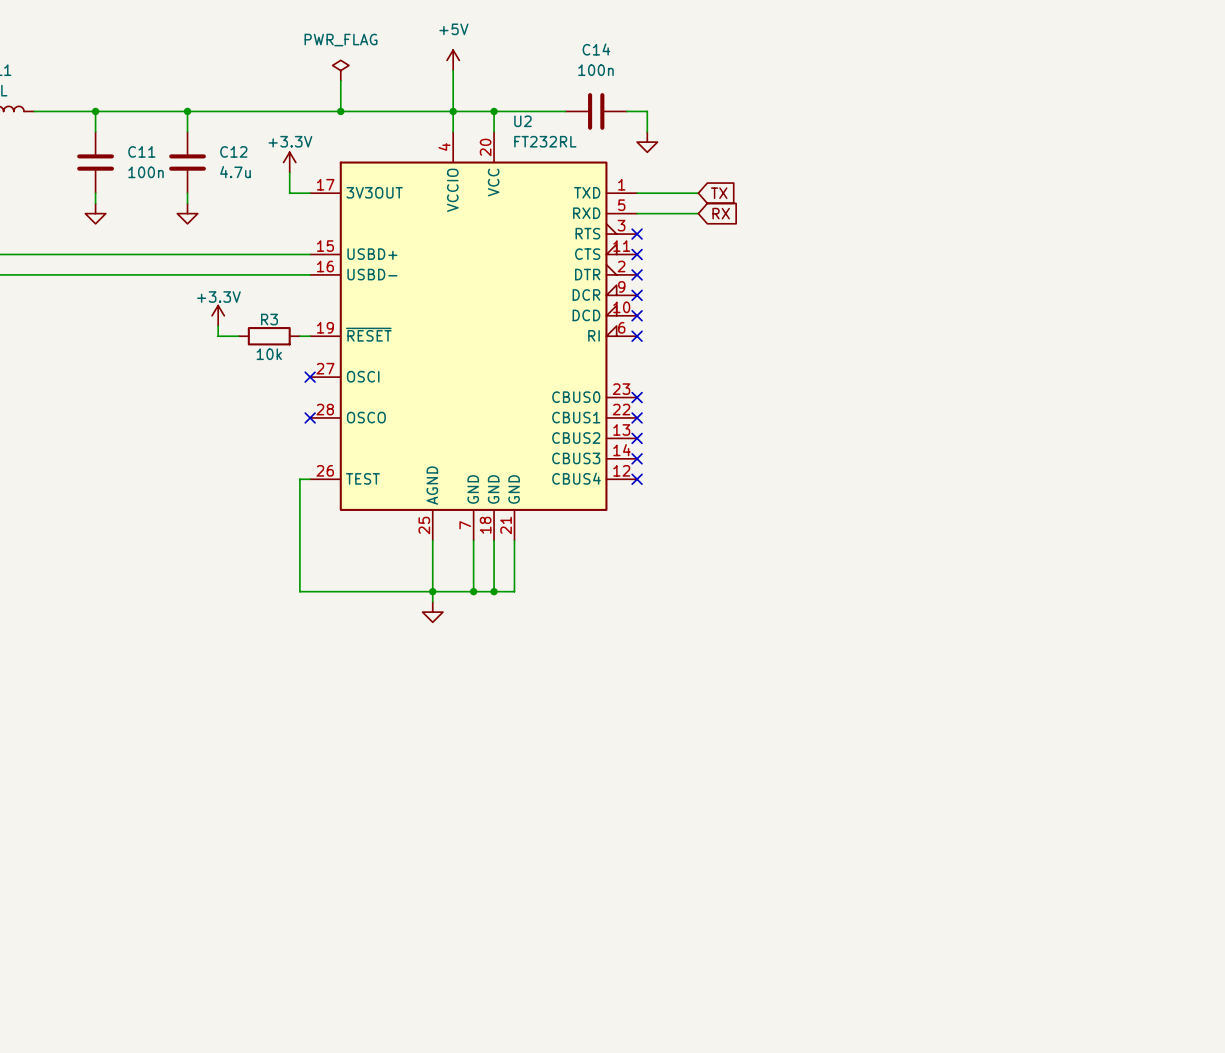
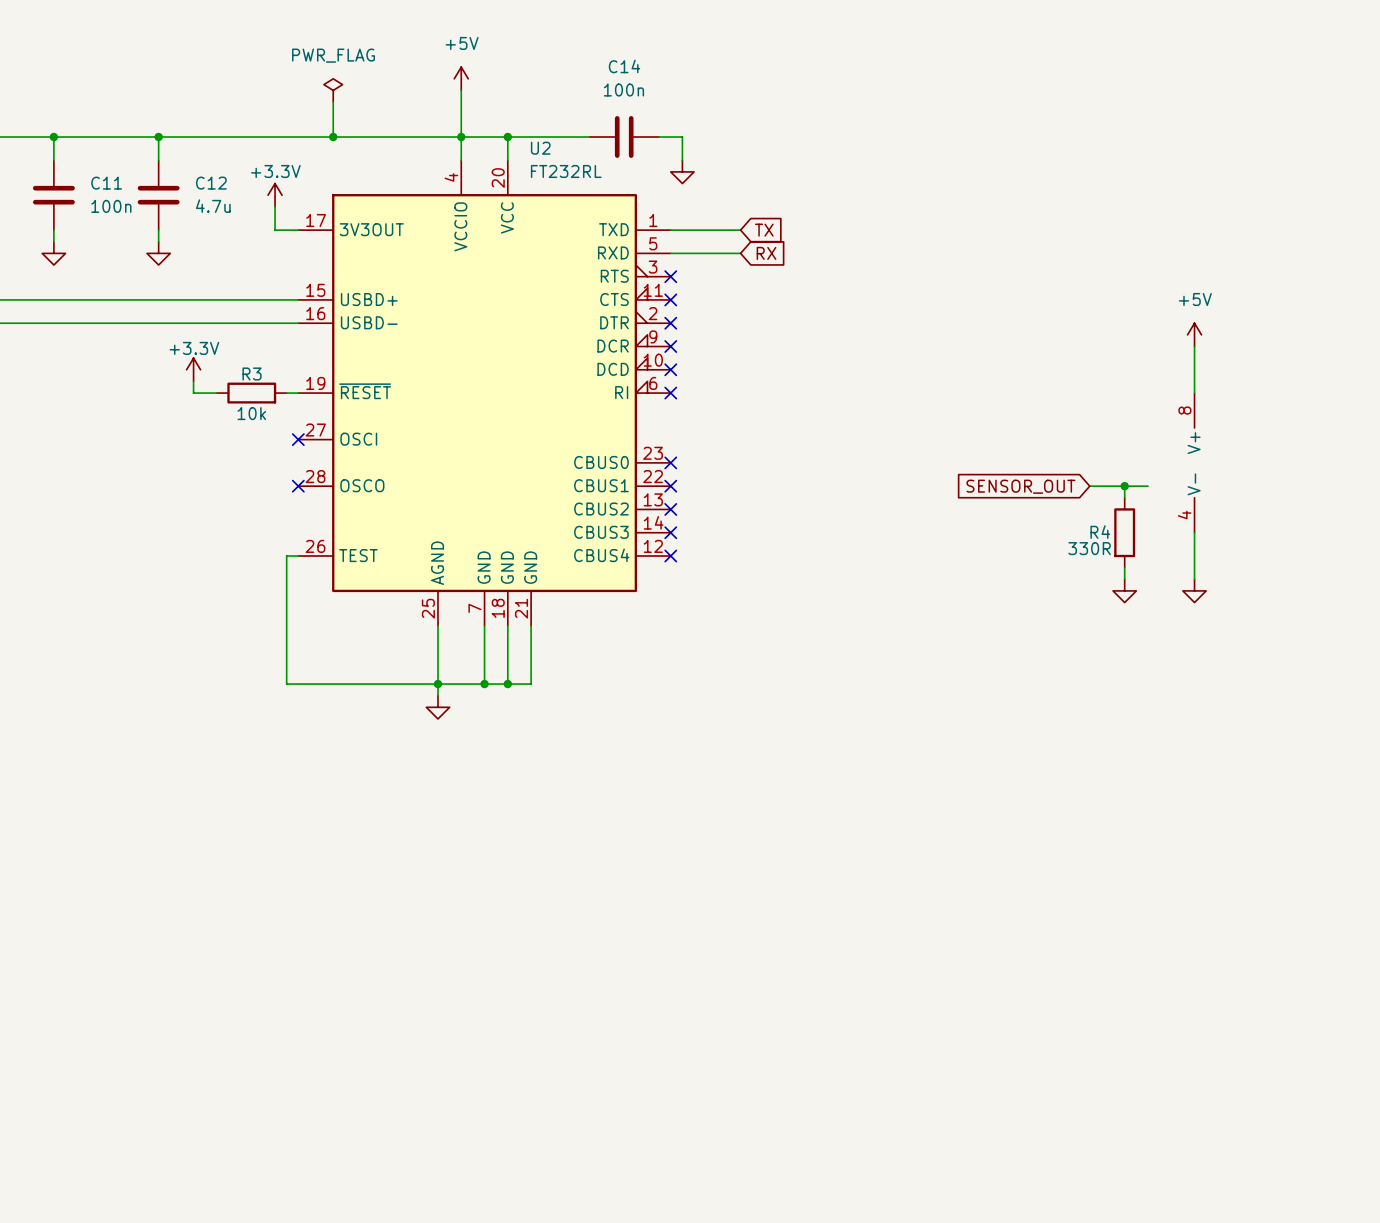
power symbol: none -> +5V (1194, 334)
wire: none -> (1194, 346) (1194, 393)
part: none -> (1194, 462)
wire: none -> (1089, 486) (1147, 486)
wire: none -> (1124, 486) (1124, 497)
junction: none -> (1124, 486)
global label: none -> SENSOR_OUT (1020, 486)
R4: none -> 330R (1124, 532)
wire: none -> (1194, 532) (1194, 579)
wire: none -> (1124, 567) (1124, 579)
power symbol: none -> (1124, 590)
power symbol: none -> (1194, 590)

